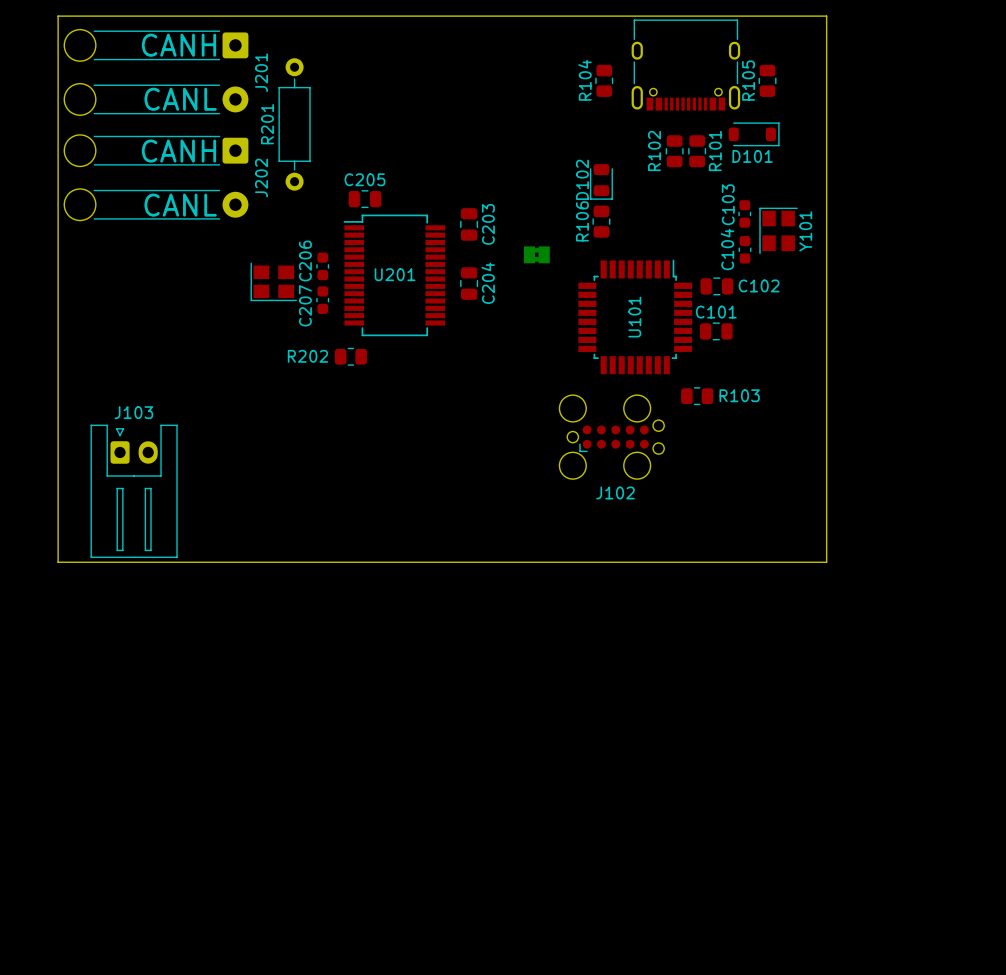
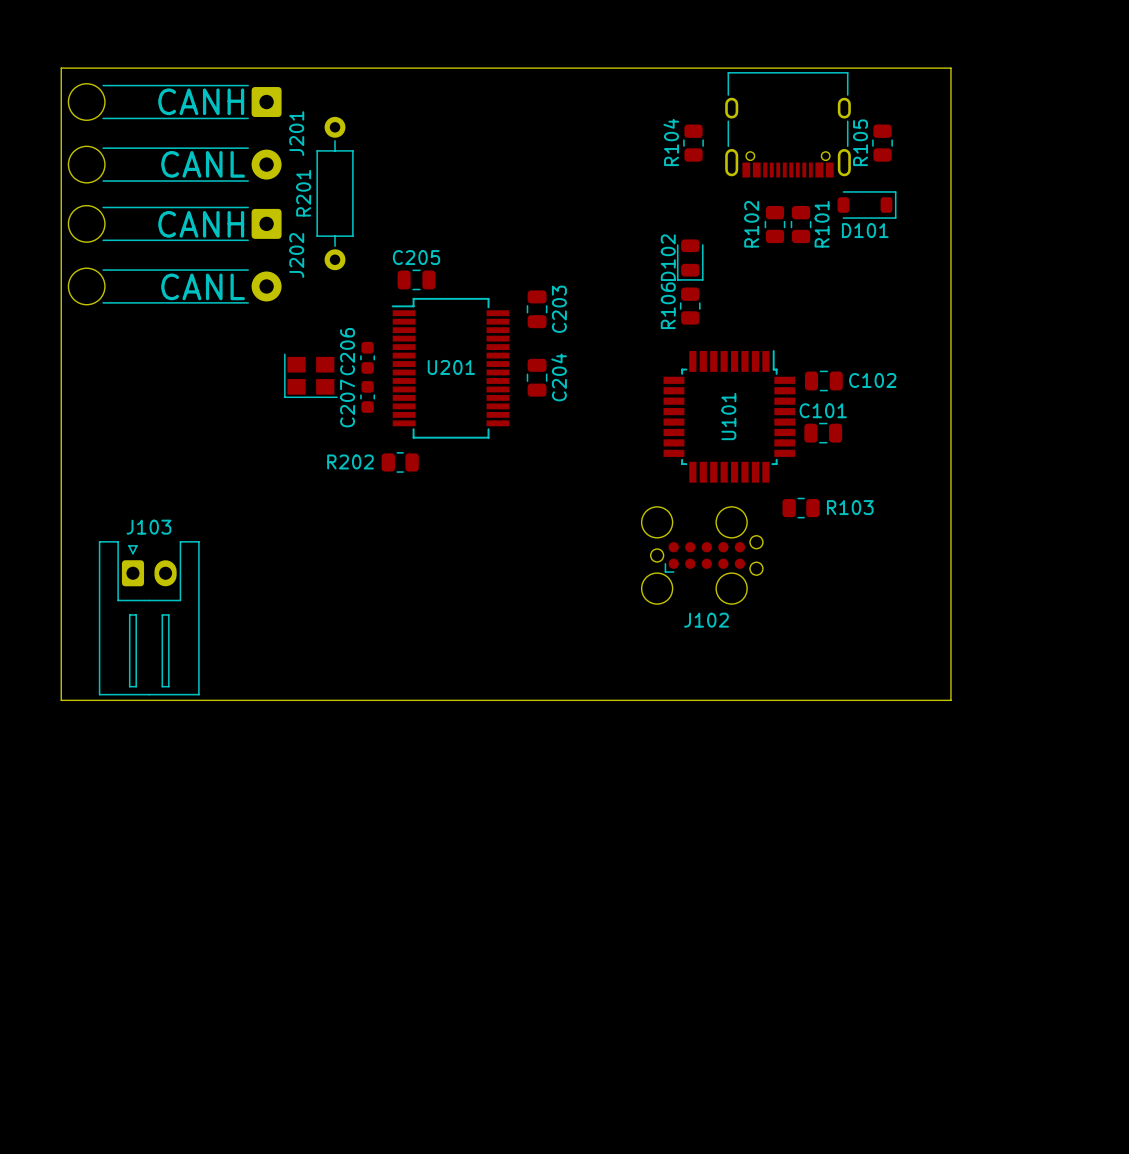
C103: (744, 213) -> none
Y101: (778, 230) -> none
C104: (745, 249) -> none
part: (536, 254) -> none

